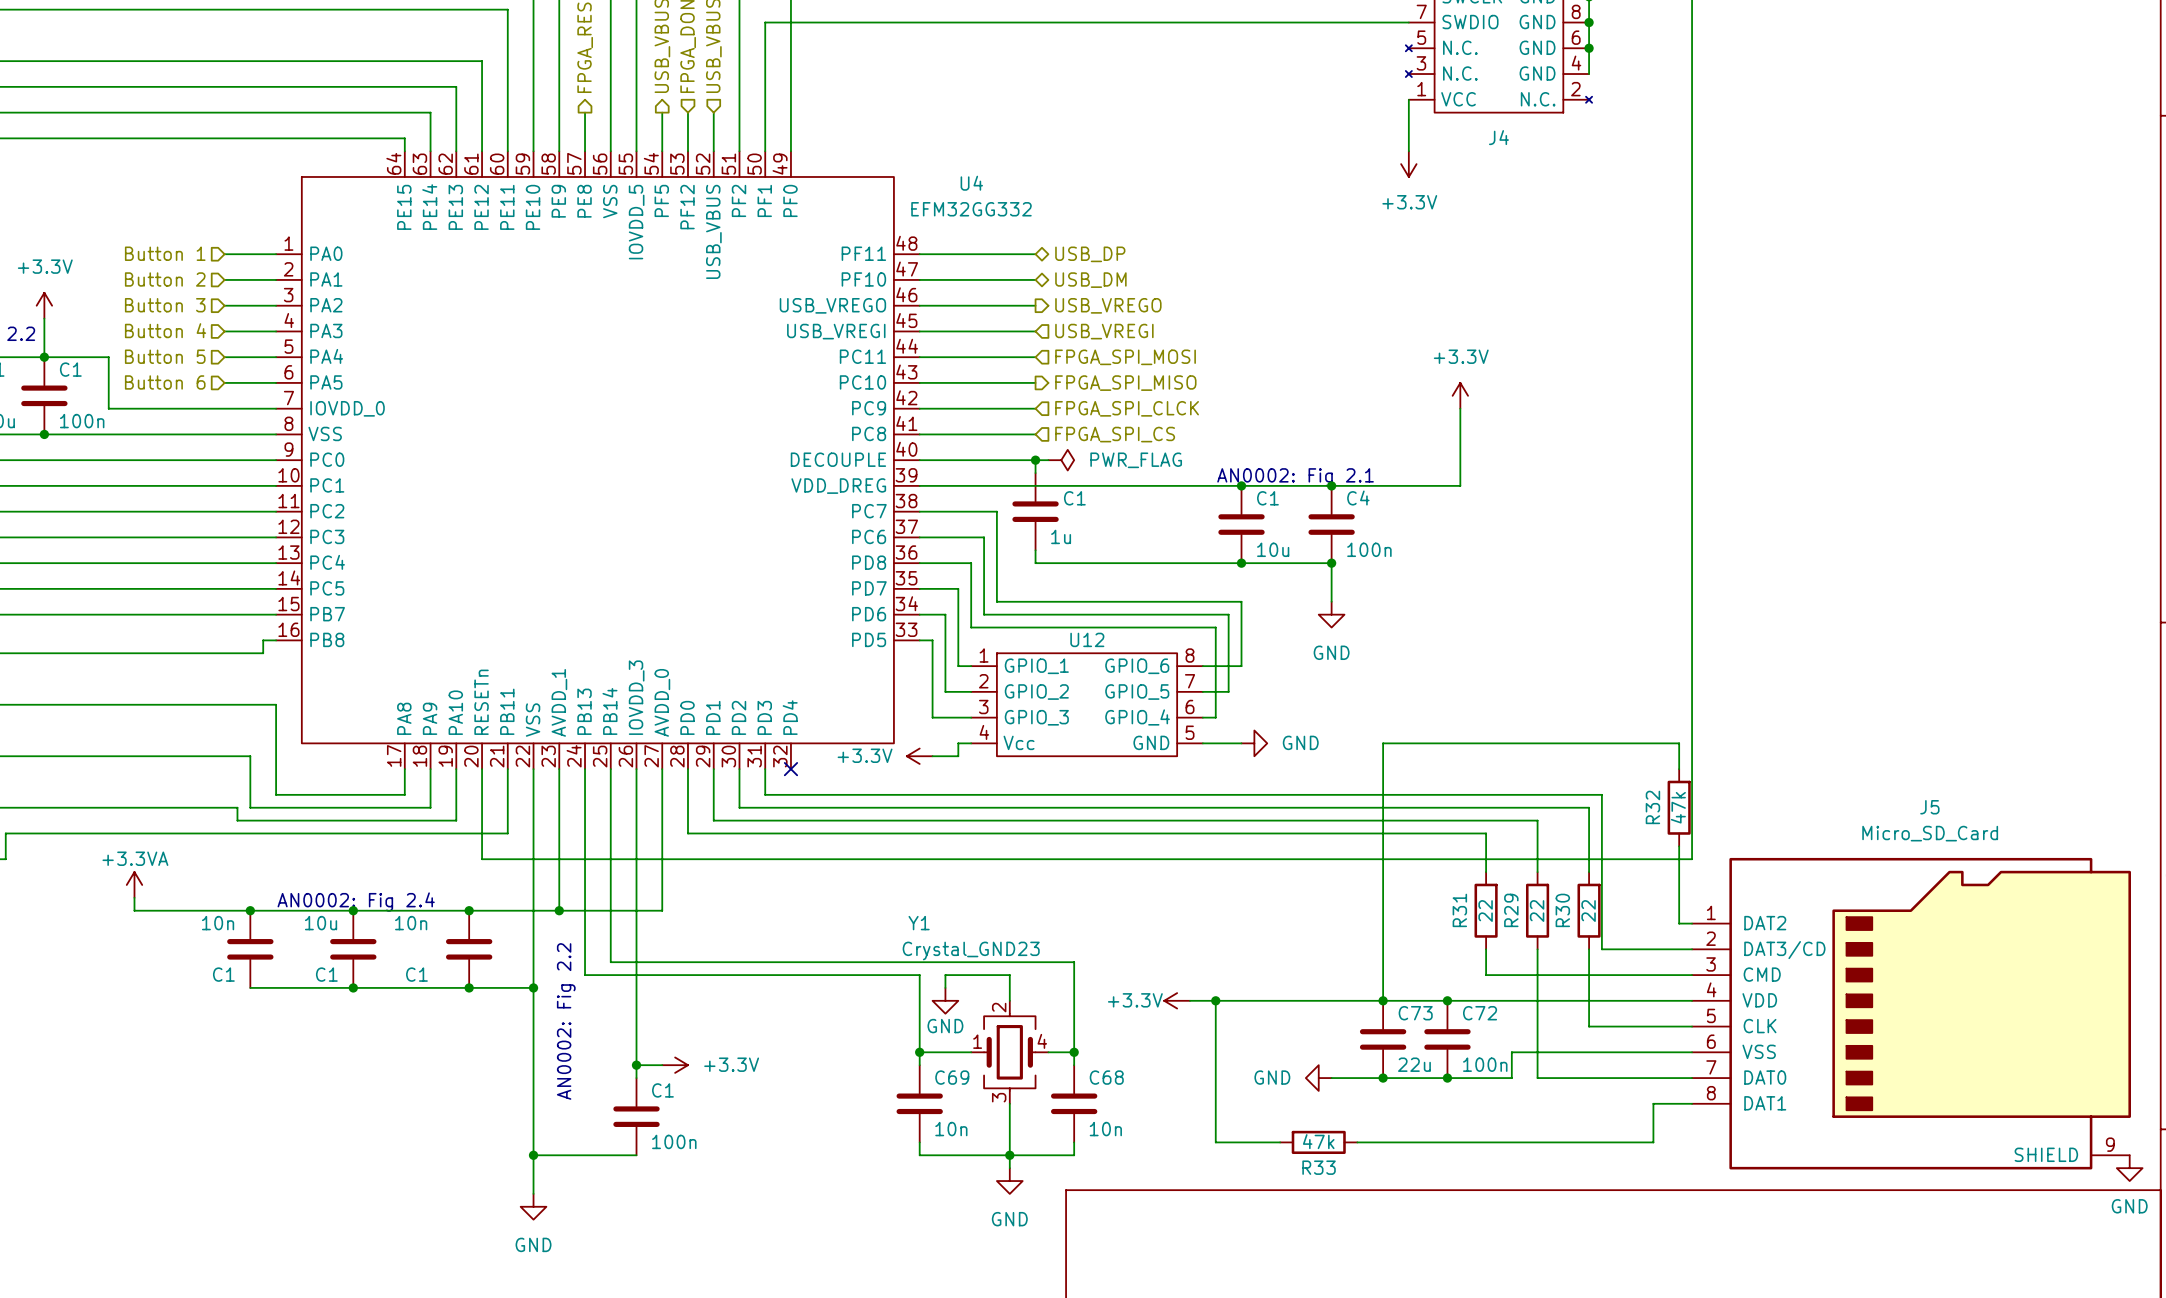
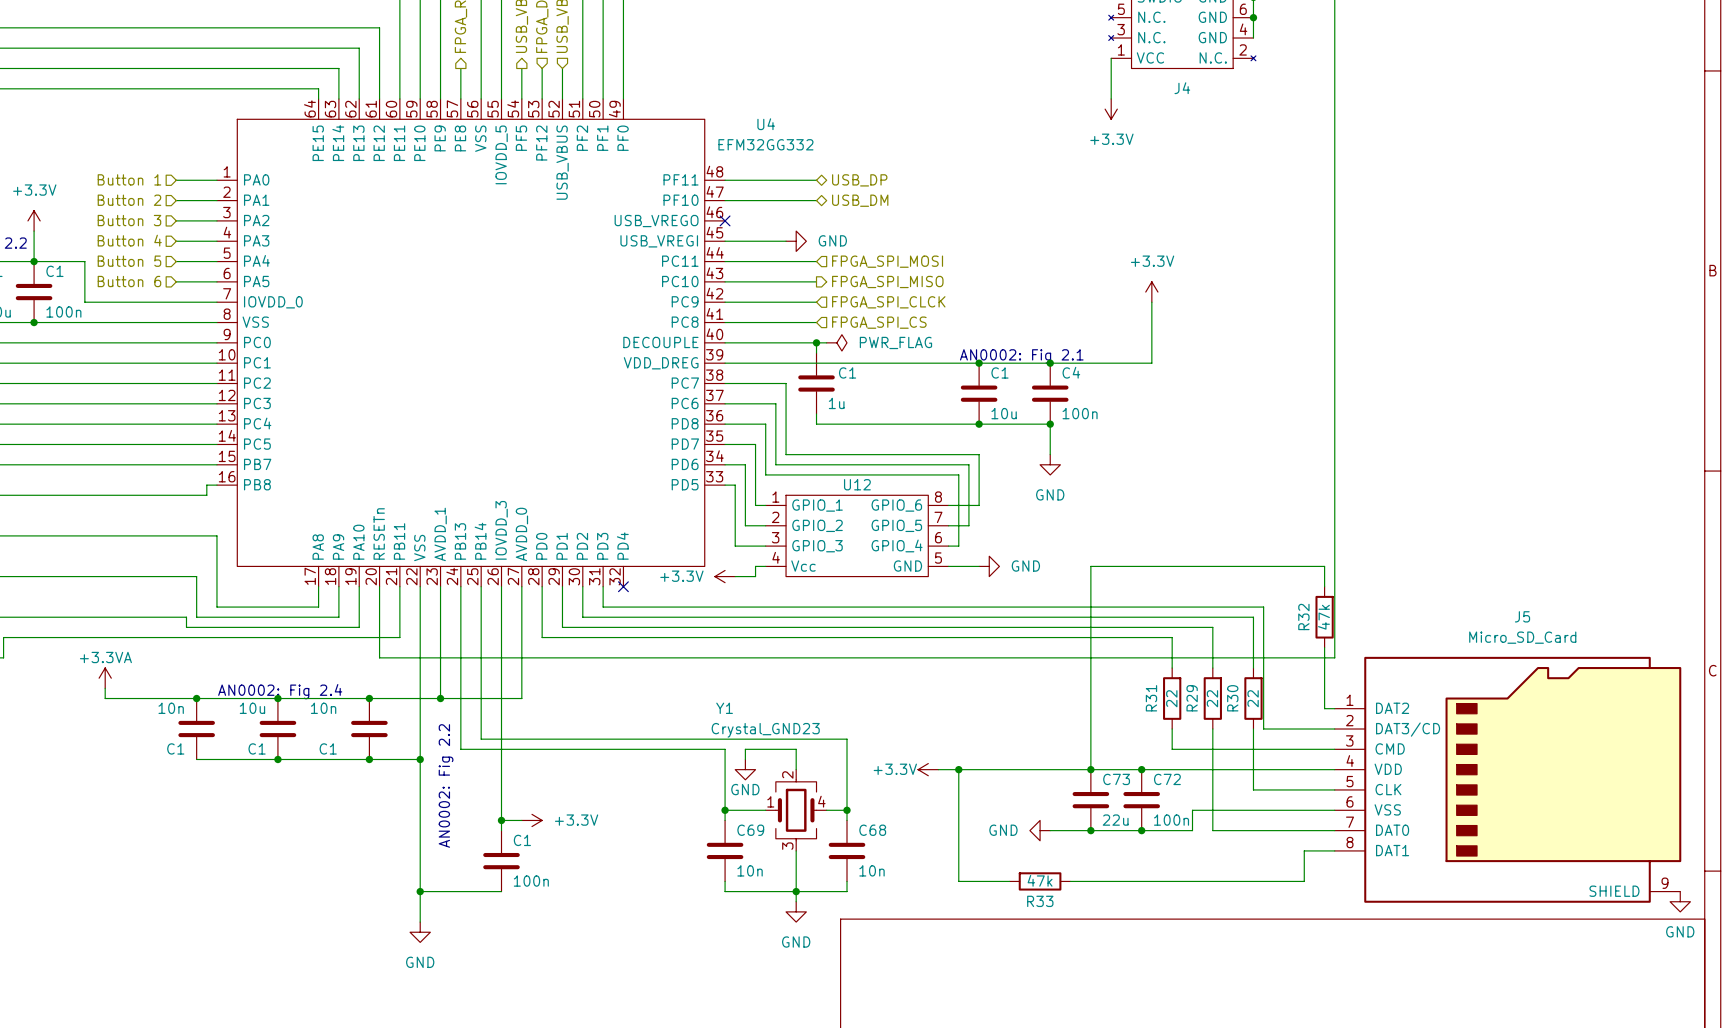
wire: (919, 305) (1035, 305) -> none
no-connect mark: none -> (725, 220)
hierarchical label: USB_VREGO (1108, 305) -> none
wire: (996, 331) (1035, 331) -> none
power symbol: none -> GND (796, 241)
hierarchical label: USB_VREGI (1104, 331) -> none

